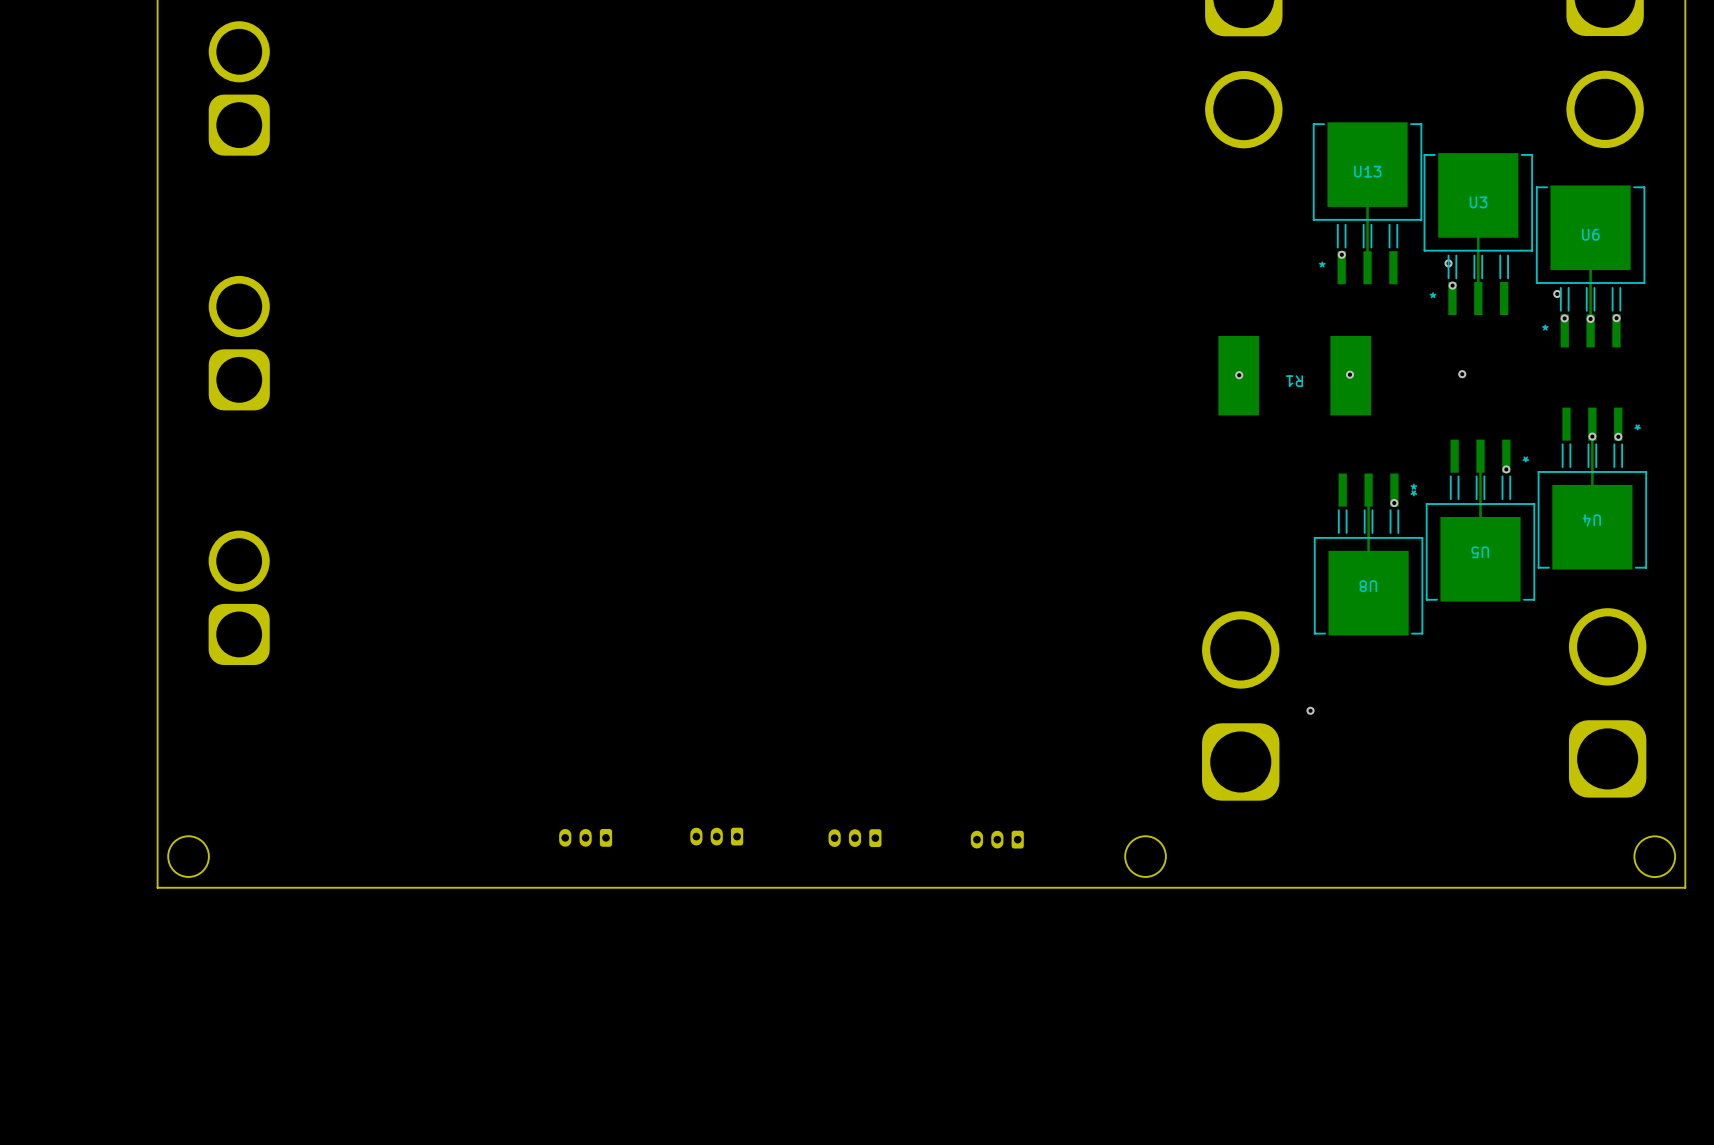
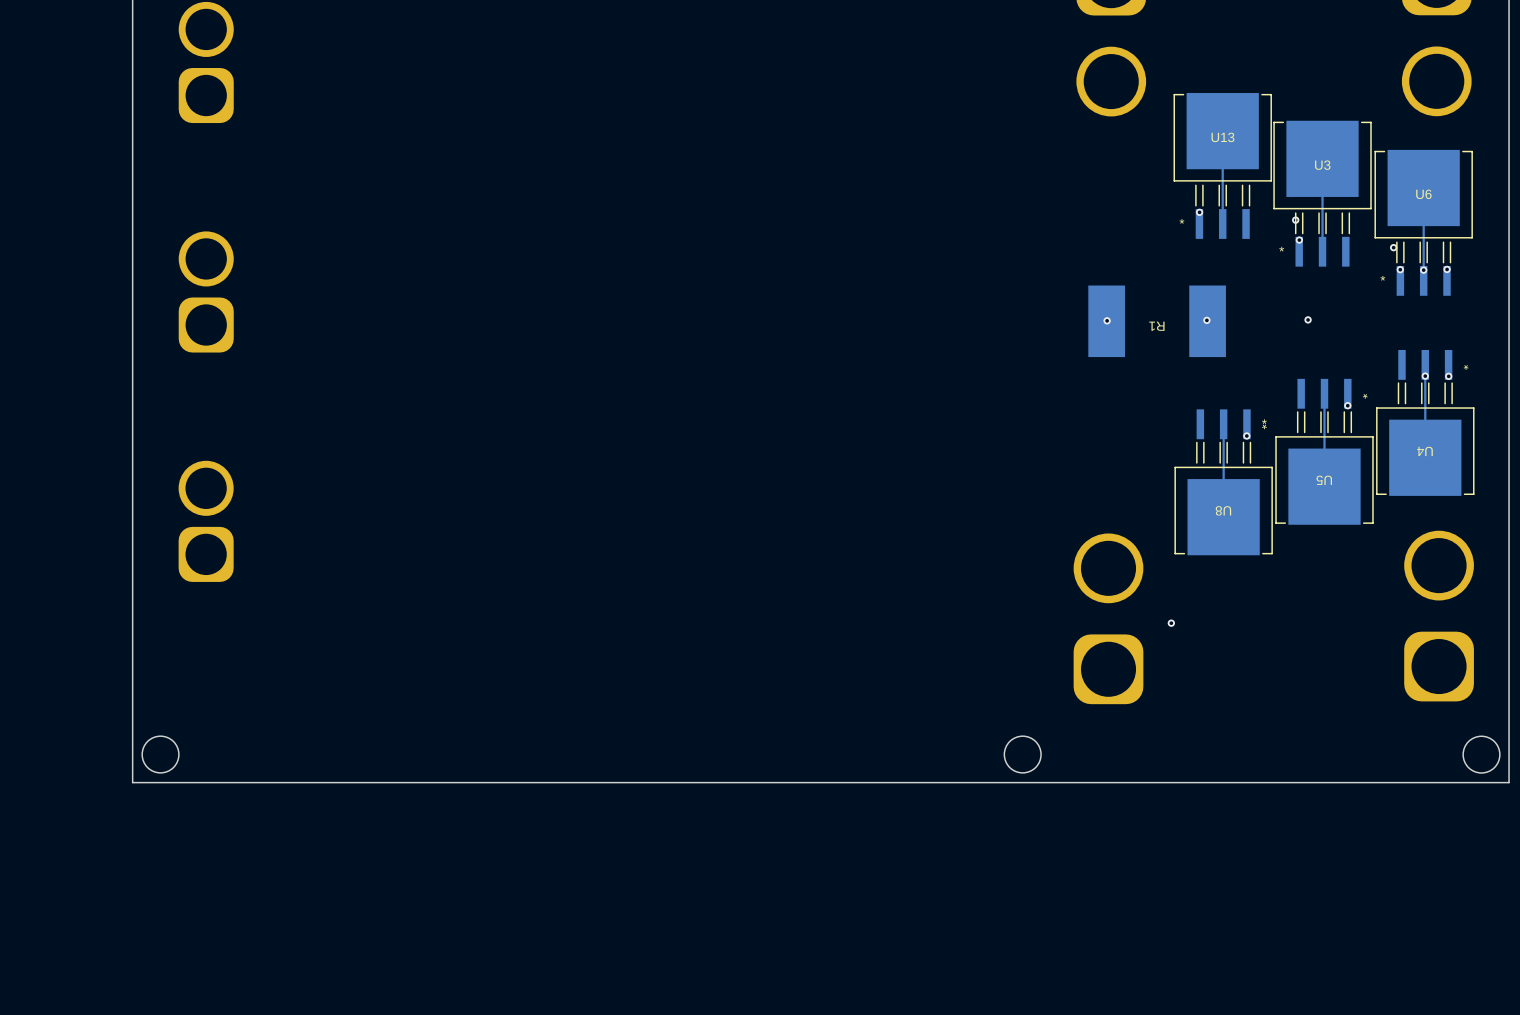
part: (716, 836) -> none
part: (585, 837) -> none
part: (855, 838) -> none
part: (997, 839) -> none

